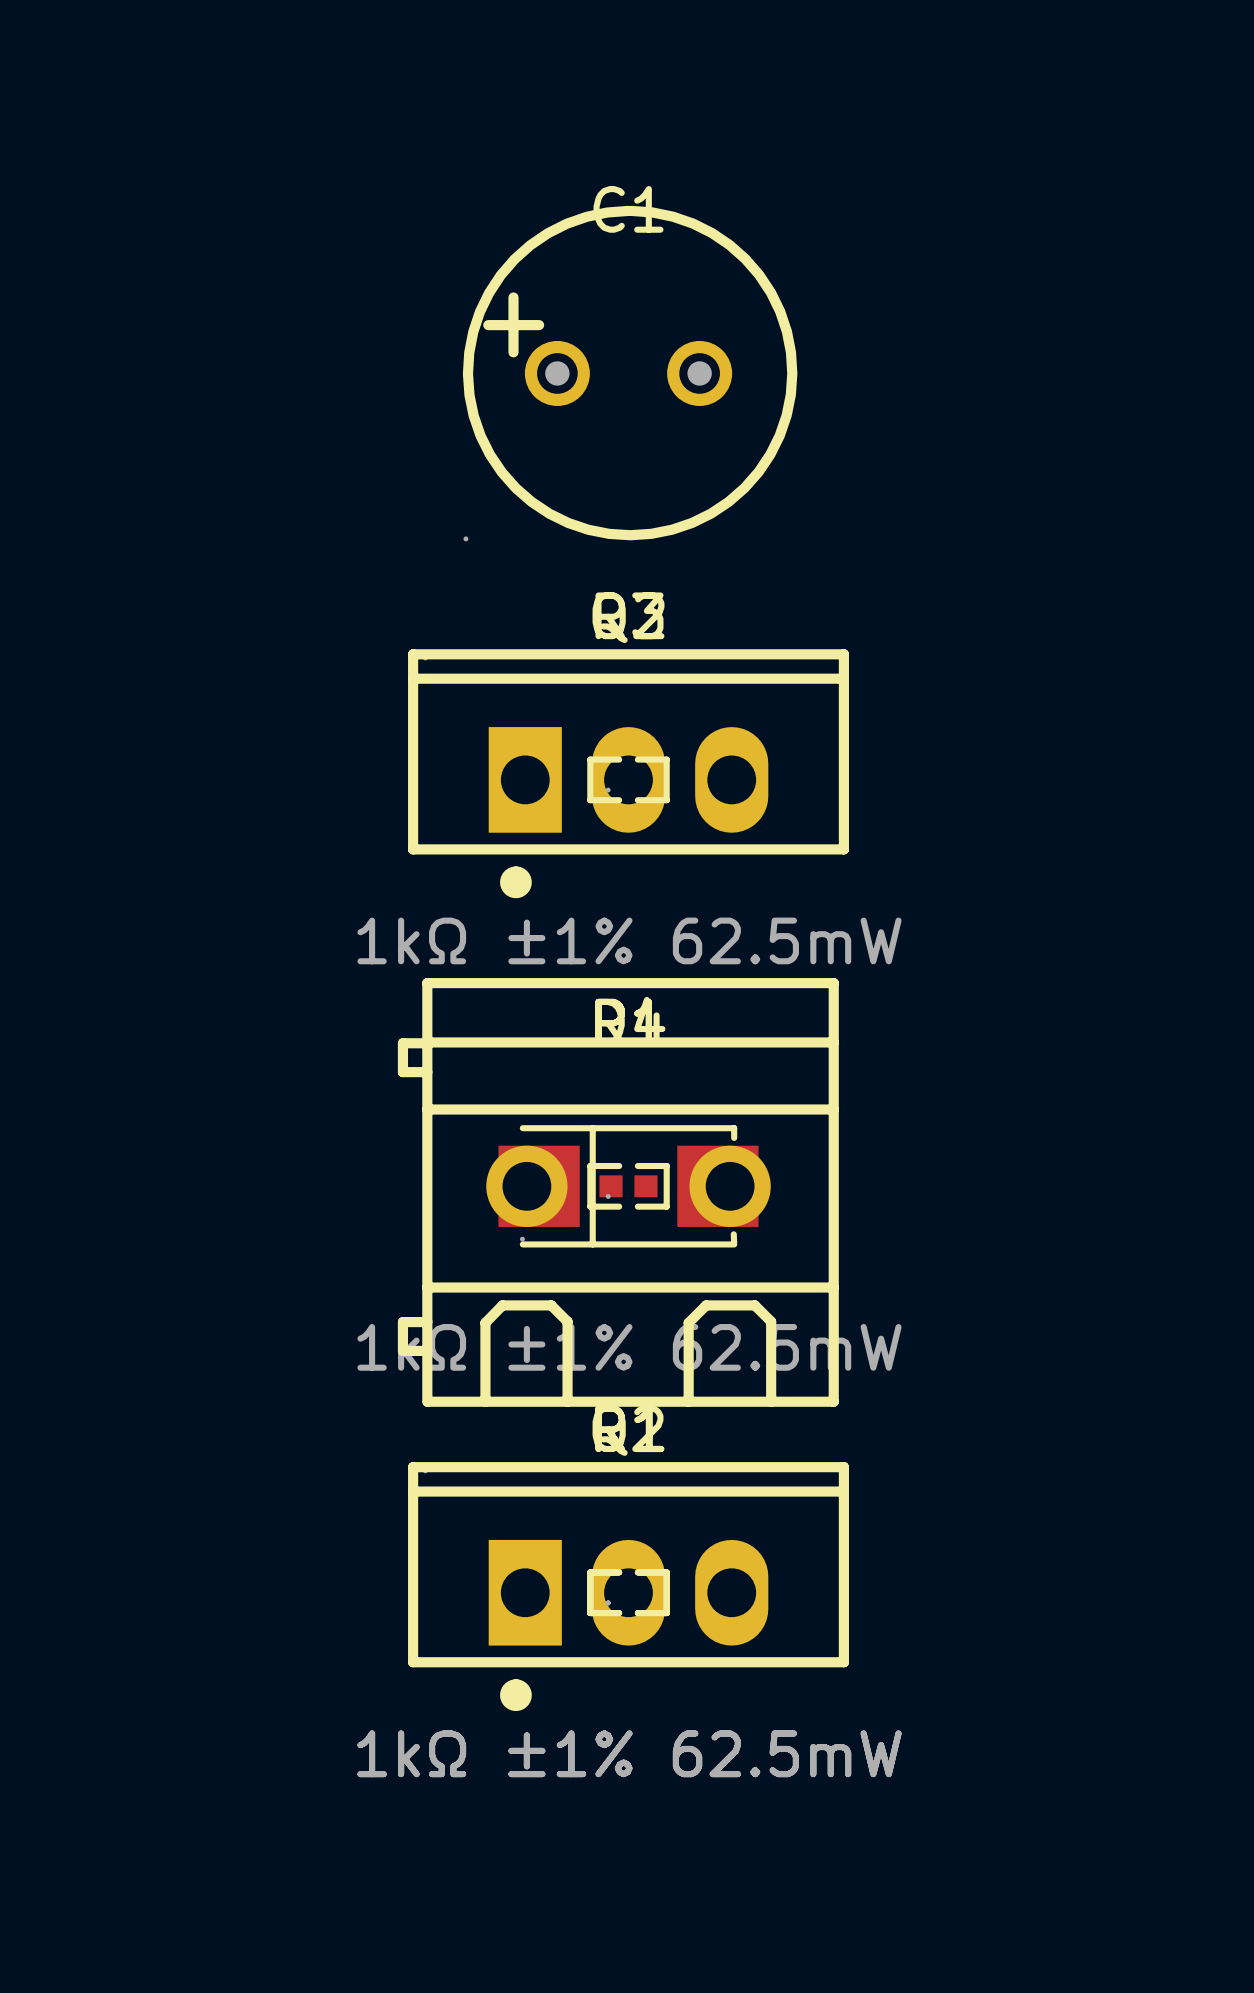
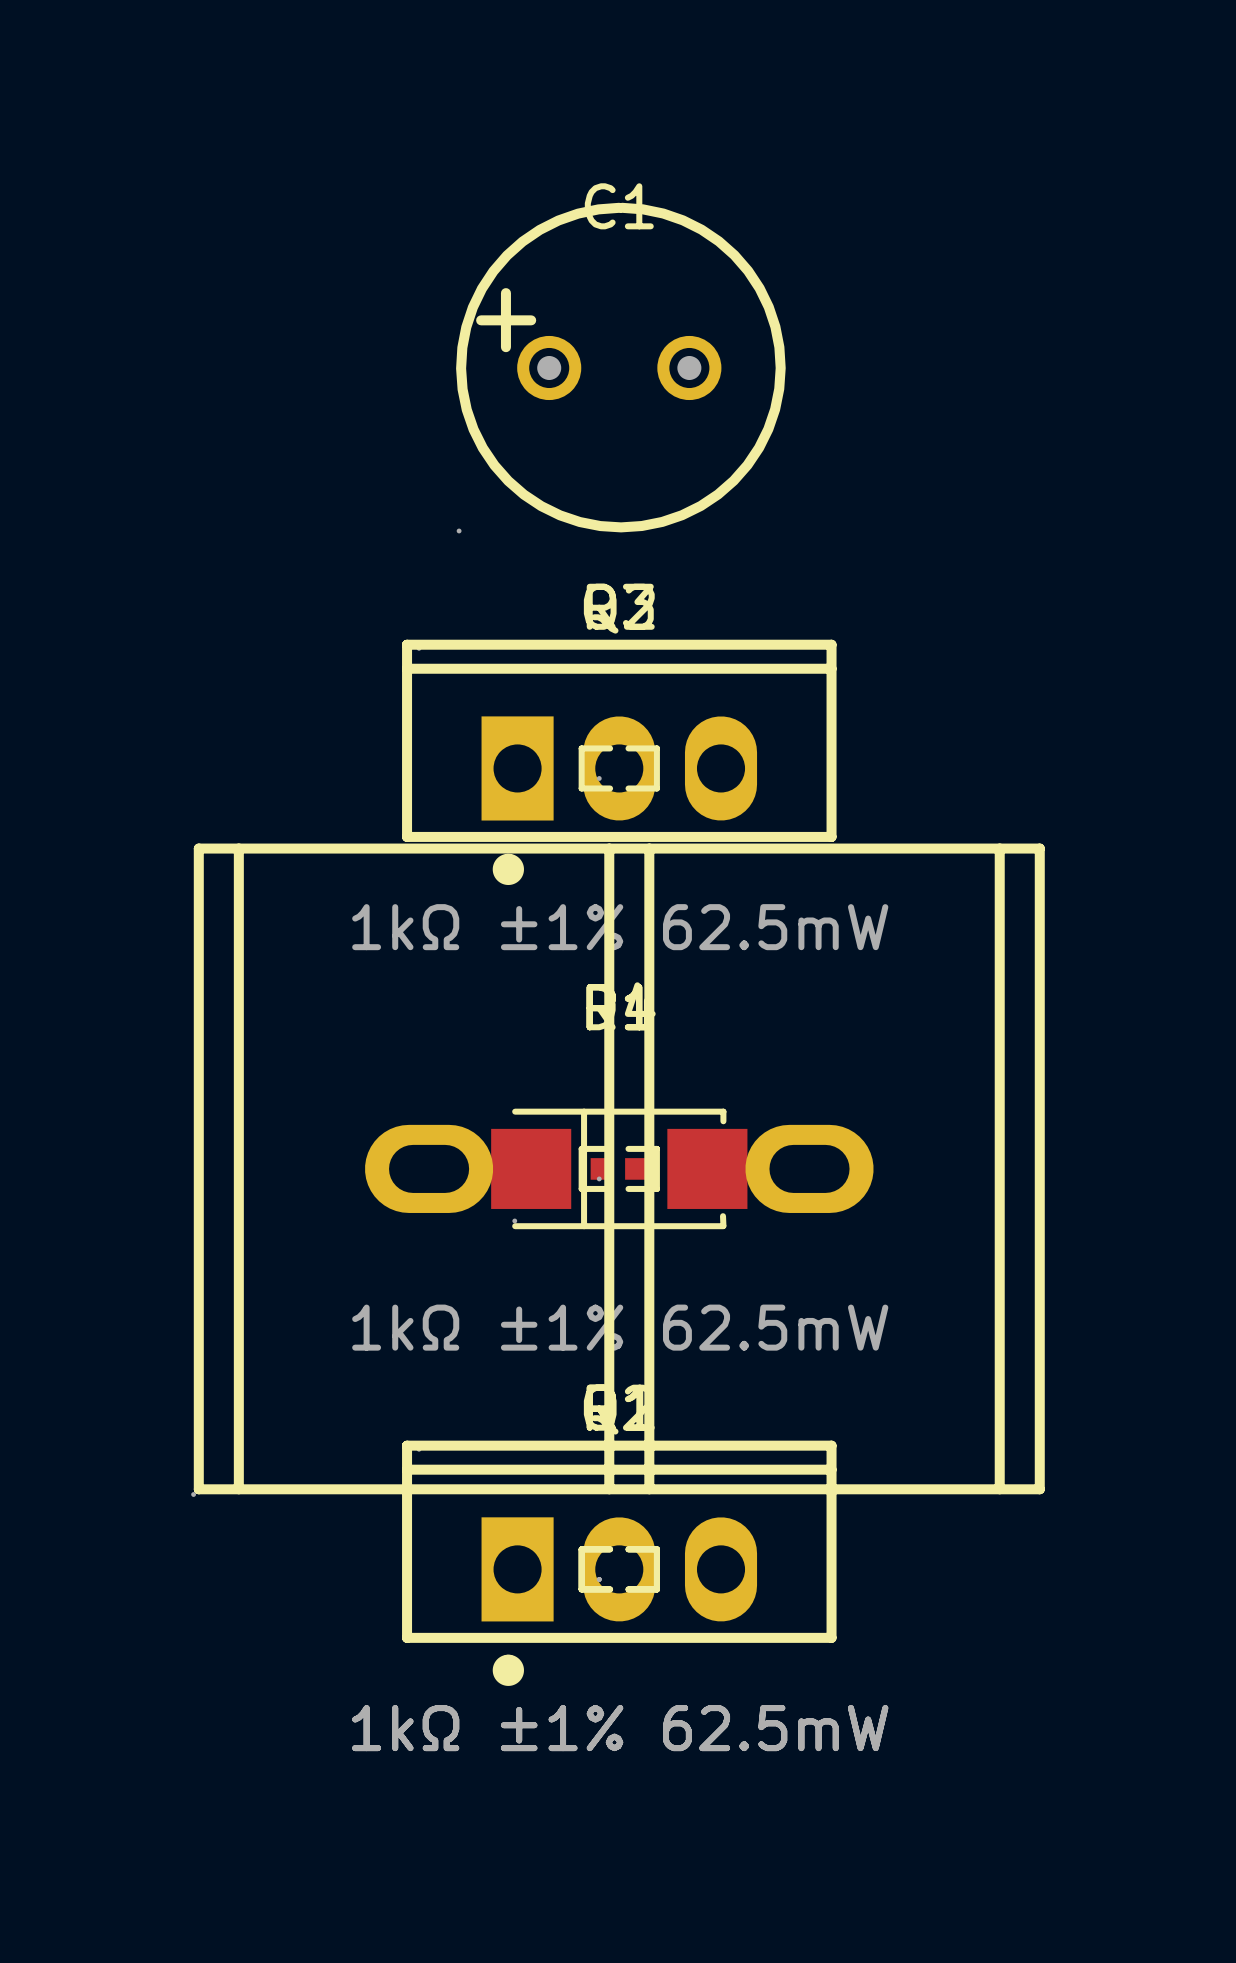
part footprint: [397, 978, 839, 1407] -> [191, 843, 1045, 1497]

